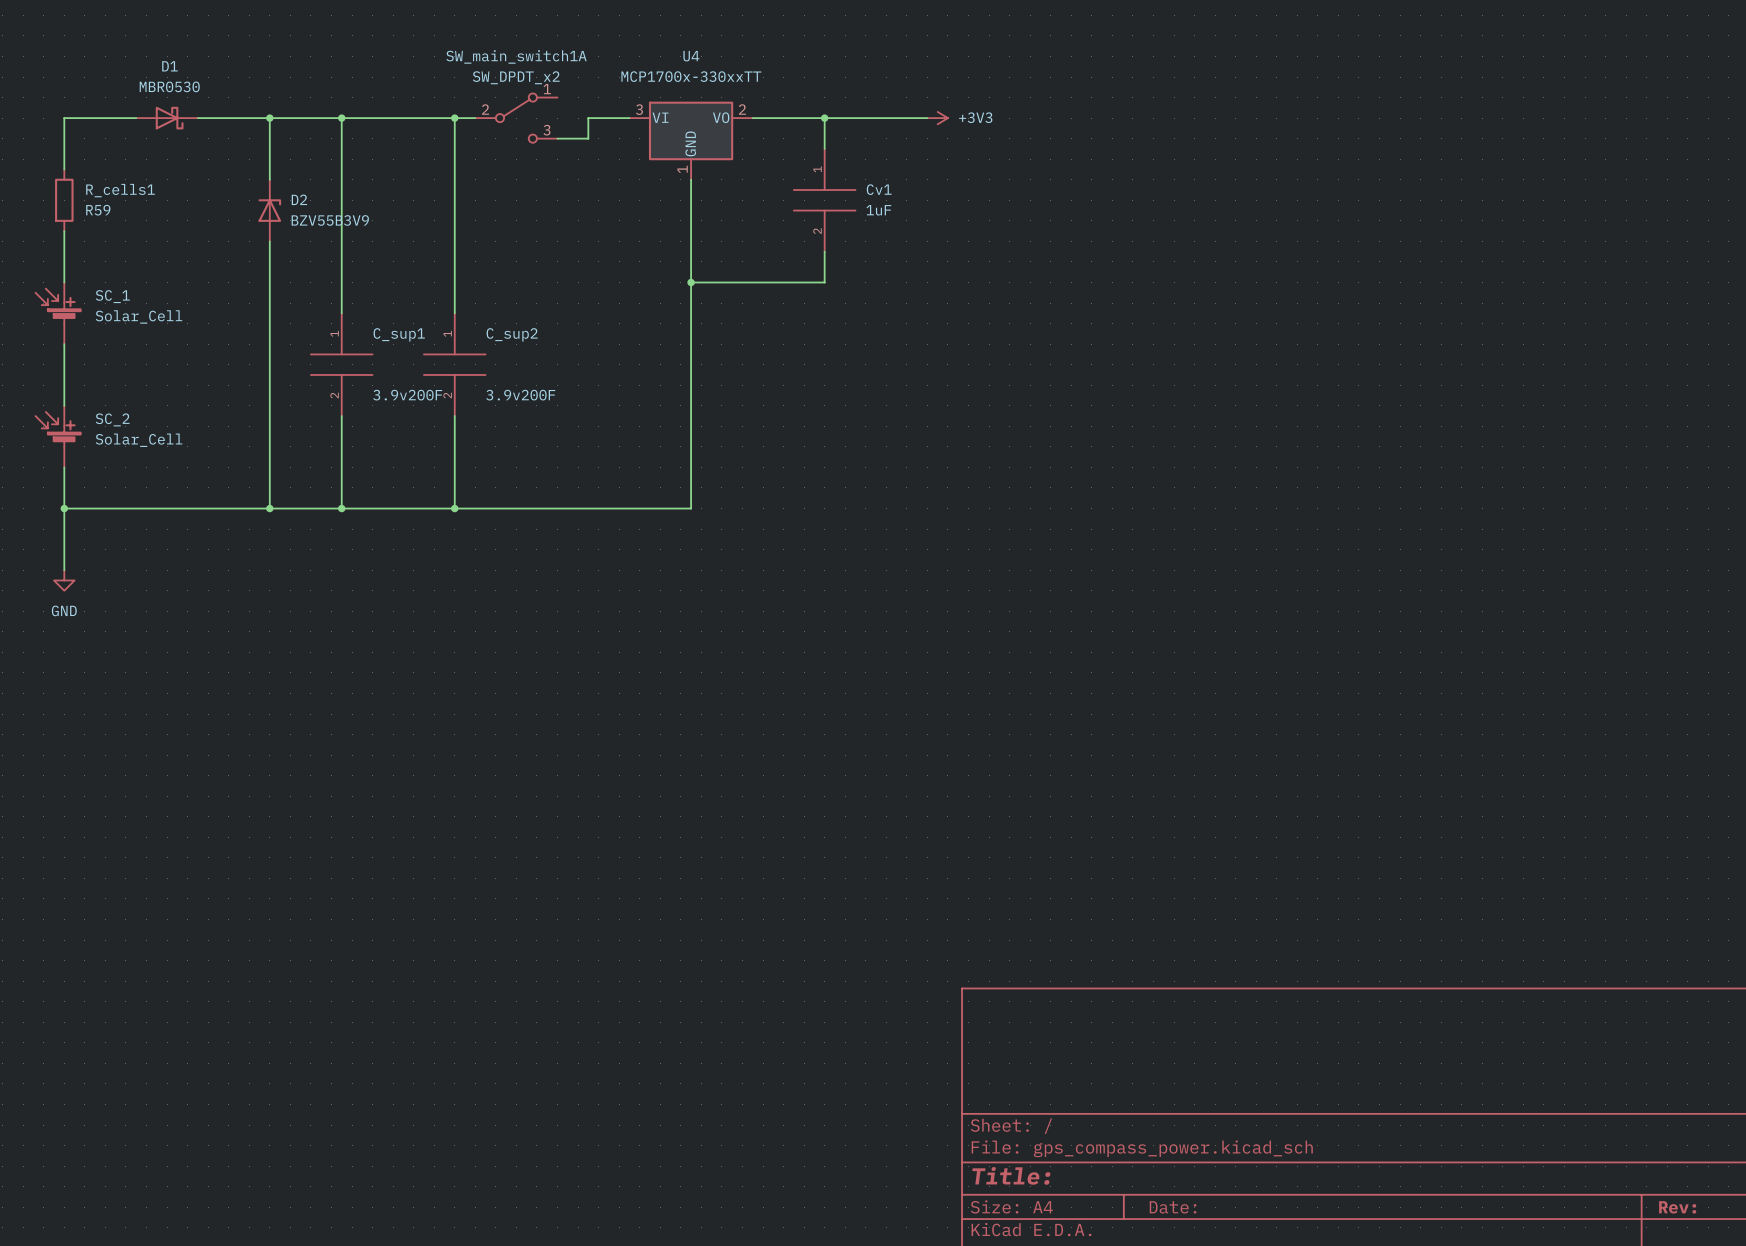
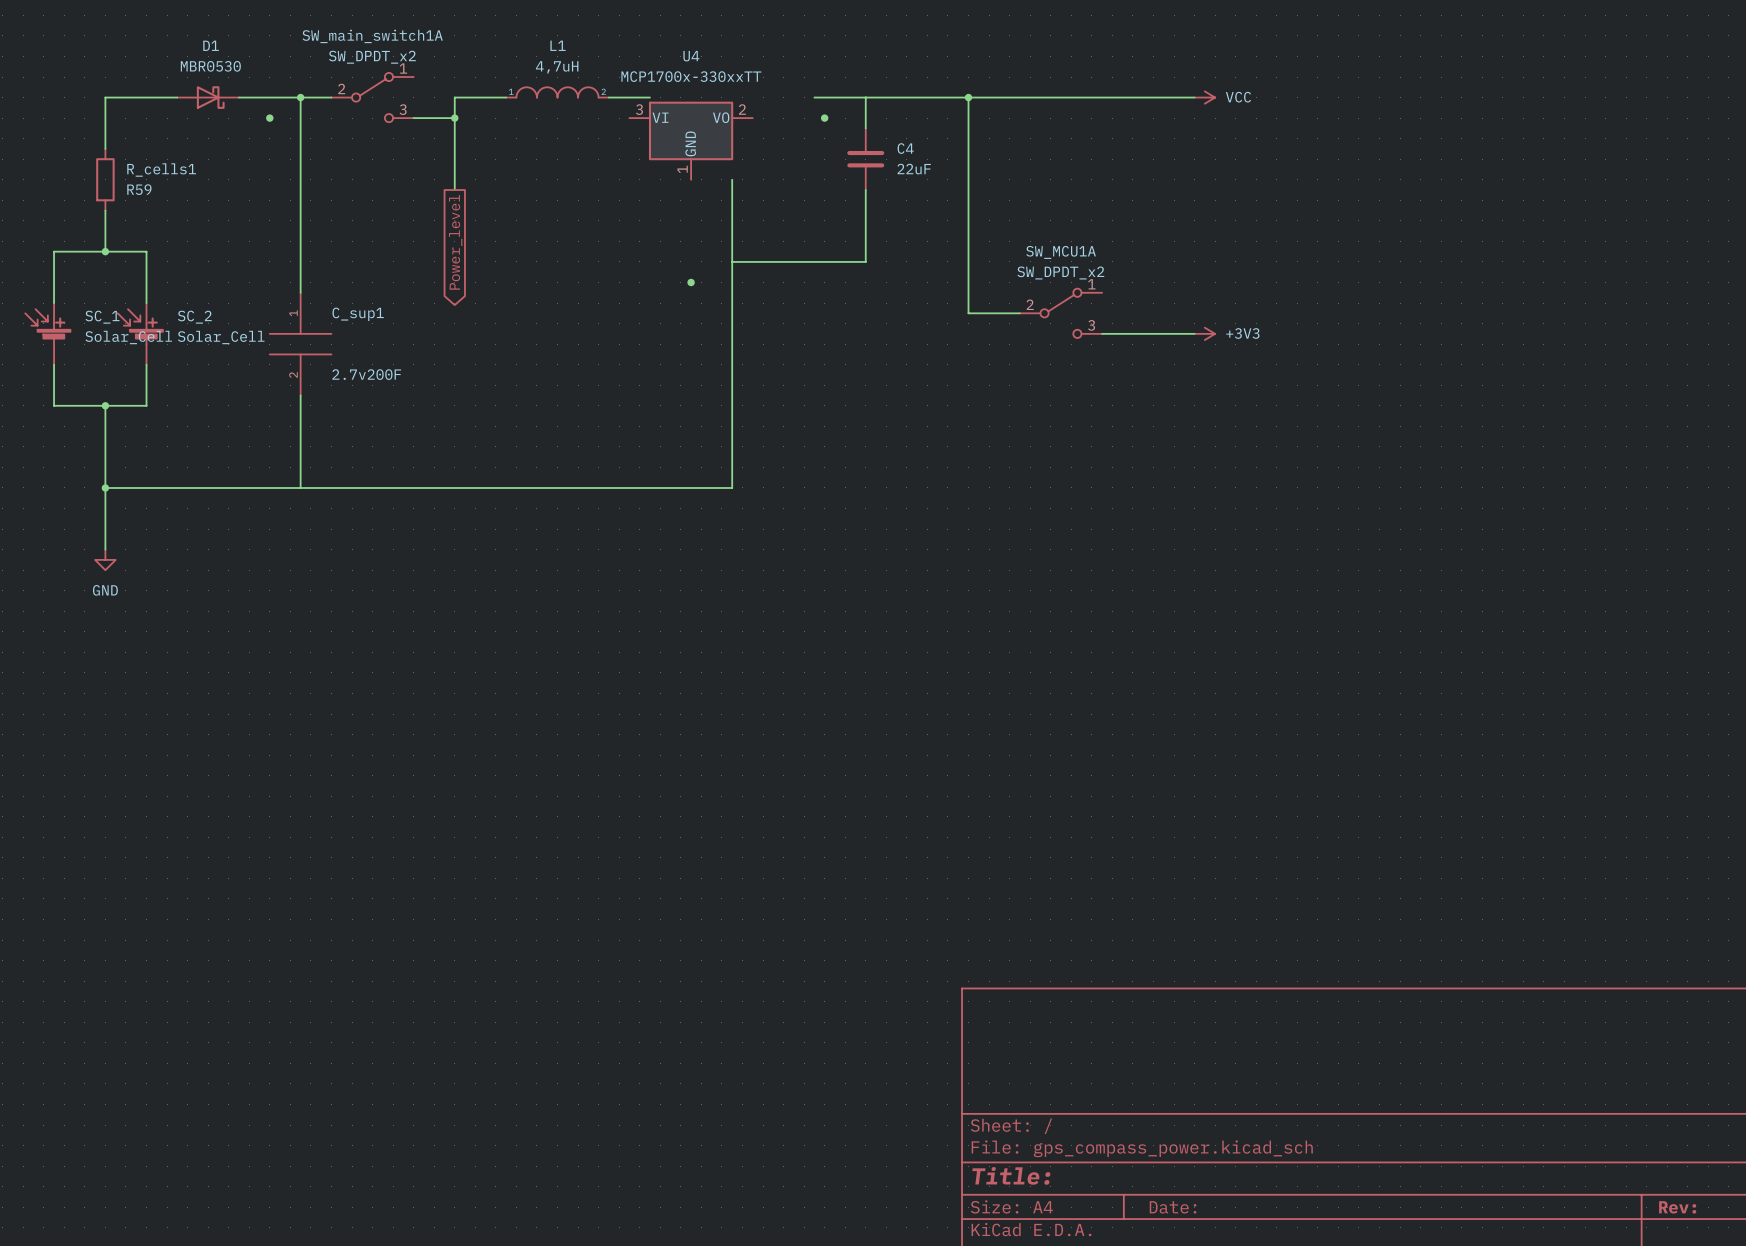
L1: none -> 4,7uH (557, 92)
wire: none -> (238, 97) (331, 97)
wire: none -> (608, 97) (649, 97)
wire: none -> (814, 97) (1194, 97)
wire: none -> (968, 97) (968, 313) (1019, 313)
junction: none -> (968, 97)
power symbol: none -> VCC (1204, 97)
wire: (136, 118) (64, 118) (64, 169) -> (177, 97) (105, 97) (105, 148)
D1 position: (167, 118) -> (208, 97)
wire: (197, 118) (413, 118) -> none
wire: (269, 118) (269, 179) -> none
wire: (341, 118) (341, 313) -> (300, 97) (300, 292)
junction position: (341, 118) -> (300, 97)
wire: (454, 118) (475, 118) -> (454, 118) (454, 97) (506, 97)
SW_main_switch1A position: (516, 118) -> (372, 97)
wire: (629, 118) (588, 118) (588, 138) (557, 138) -> none
wire: (752, 118) (927, 118) -> none
wire: (824, 118) (824, 148) -> (865, 97) (865, 128)
power symbol: +3V3 (937, 118) -> none
C4: none -> 22uF (865, 159)
wire: (691, 179) (691, 508) (64, 508) -> none
wire: none -> (732, 179) (732, 487) (105, 487)
wire: (454, 190) (454, 313) -> none
wire: none -> (865, 190) (865, 261) (732, 261)
R_cells1 position: (64, 200) -> (105, 179)
Cv1: 1uF (824, 200) -> none
wire: none -> (105, 210) (105, 251)
D2: BZV55B3V9 (269, 210) -> none
wire: (64, 231) (64, 282) -> none
wire: (269, 241) (269, 508) -> none
global label: none -> Power_level (455, 242)
junction: none -> (105, 251)
wire: (824, 251) (824, 282) (691, 282) -> none
wire: none -> (54, 303) (54, 251) (146, 251) (146, 303)
SC_1 position: (58, 313) -> (47, 333)
SW_MCU1A: none -> SW_DPDT_x2 (1060, 313)
wire: none -> (1102, 333) (1194, 333)
power symbol: none -> +3V3 (1204, 333)
wire: (64, 344) (64, 405) -> none
wire: none -> (54, 364) (54, 405) (146, 405) (146, 364)
C_sup1 position: (341, 364) -> (300, 344)
C_sup2: 3.9v200F (454, 364) -> none
C_sup1 value: 3.9v200F (407, 395) -> 2.7v200F (366, 374)
wire: none -> (105, 405) (105, 549)
junction: none -> (105, 405)
wire: (341, 416) (341, 508) -> (300, 395) (300, 487)
wire: (454, 416) (454, 508) -> none
SC_2 position: (58, 436) -> (140, 333)
wire: (64, 467) (64, 570) -> none
junction position: (64, 508) -> (105, 487)
junction: (269, 508) -> none
junction: (341, 508) -> none
junction: (454, 508) -> none
power symbol position: GND (64, 580) -> GND (105, 559)

